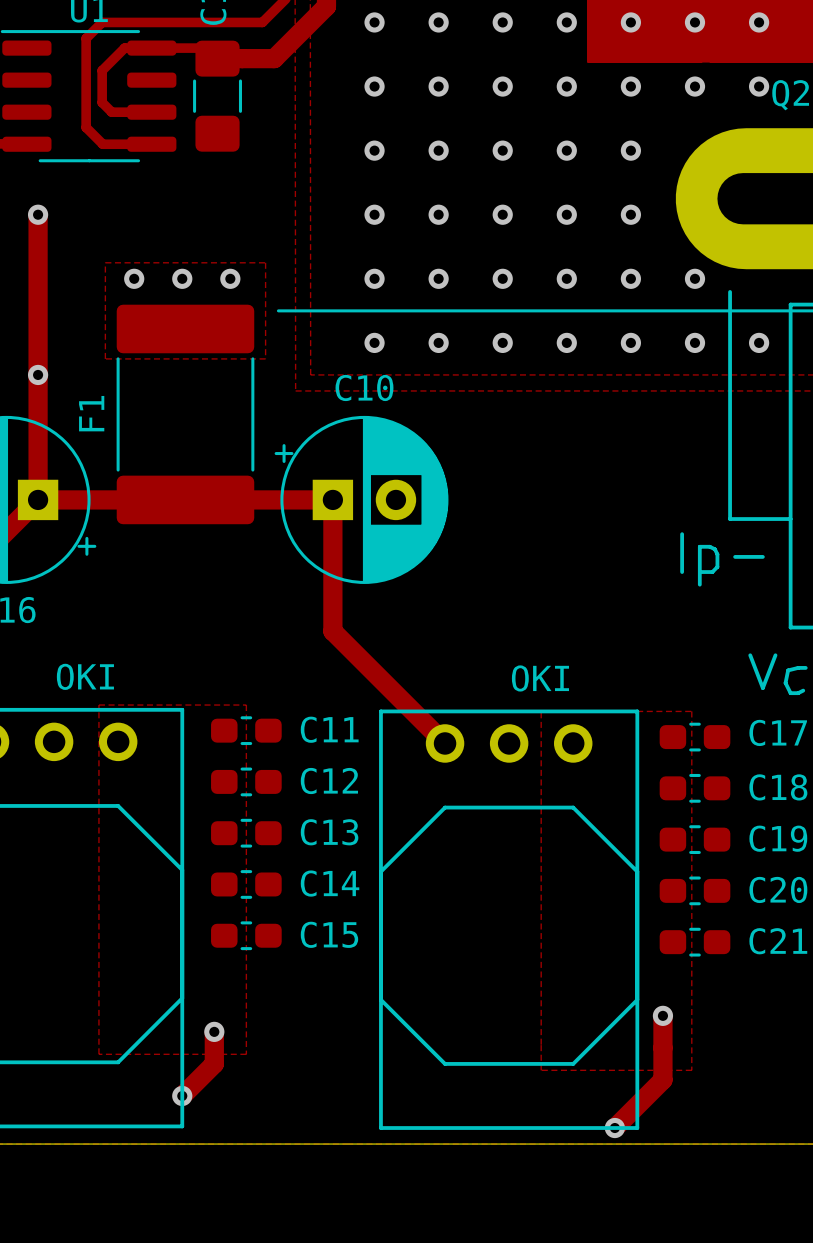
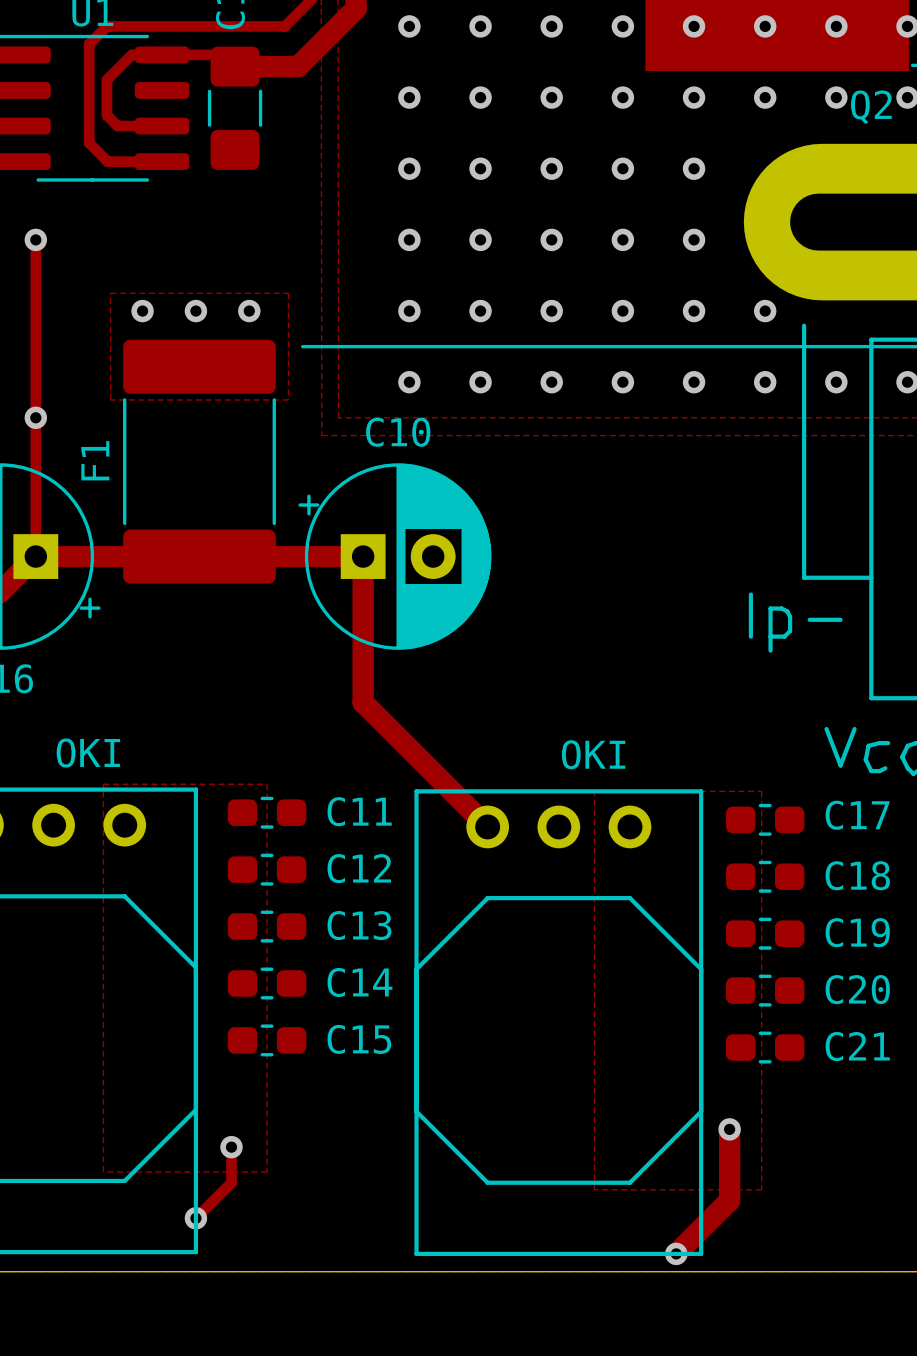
track width: thick (38, 214) (38, 499) -> thin (35, 239) (35, 556)
track width: thick (214, 1031) (214, 1063) (182, 1095) -> thin (231, 1147) (231, 1182) (195, 1218)

